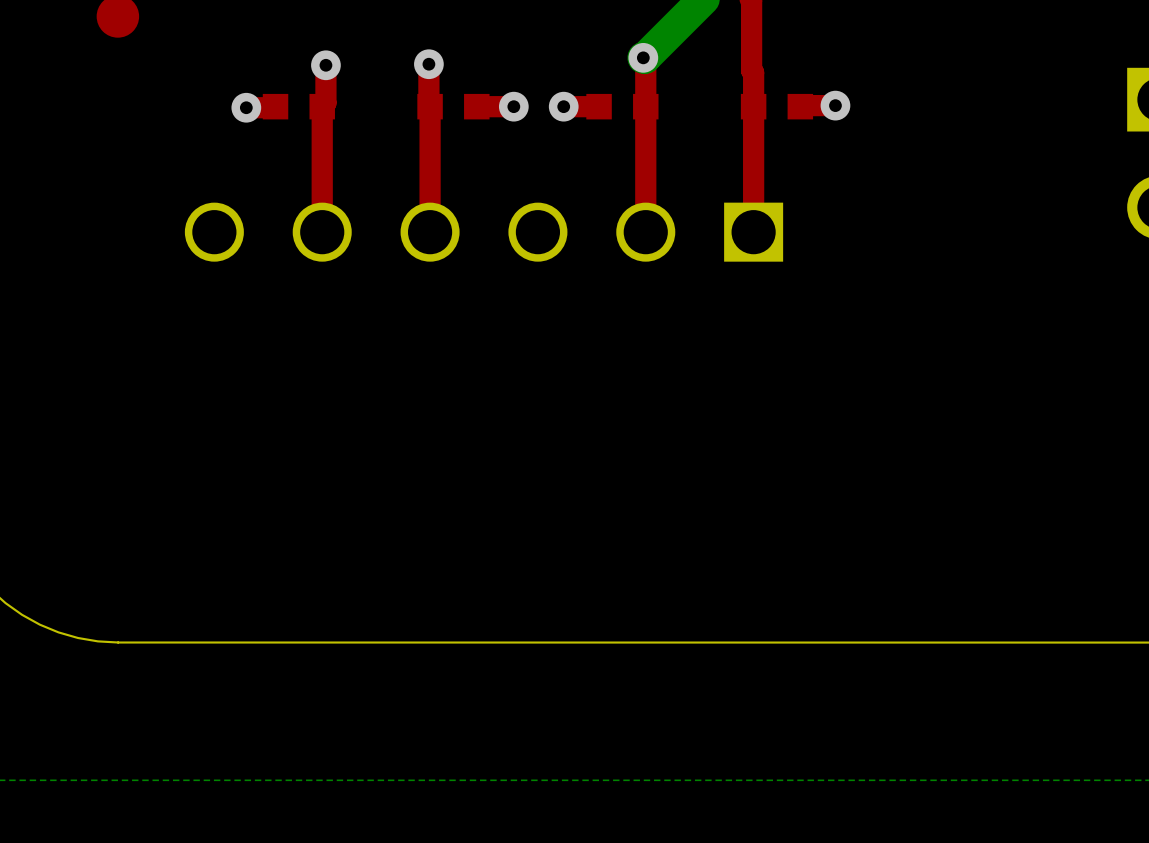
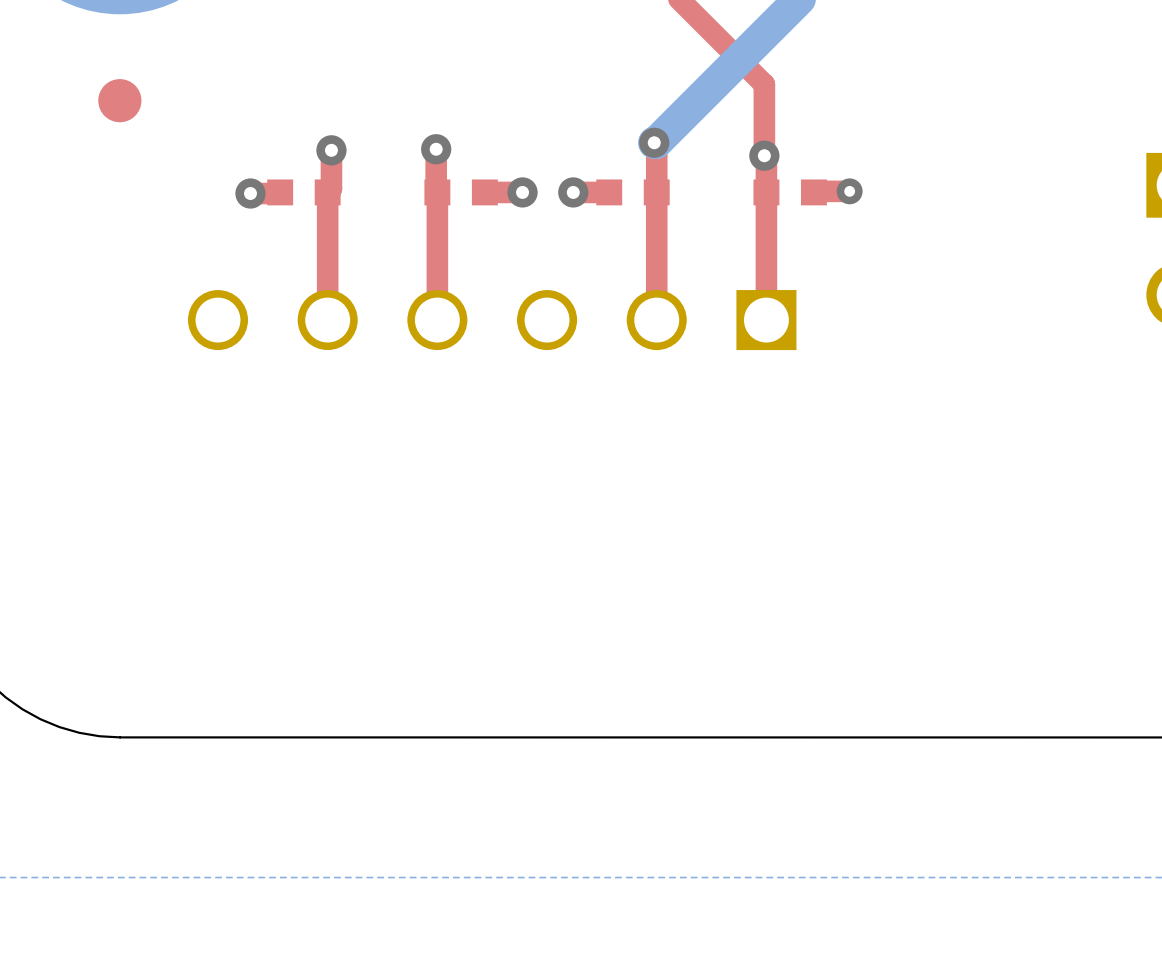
via position: (835, 105) -> (764, 155)
via: none -> (849, 191)

